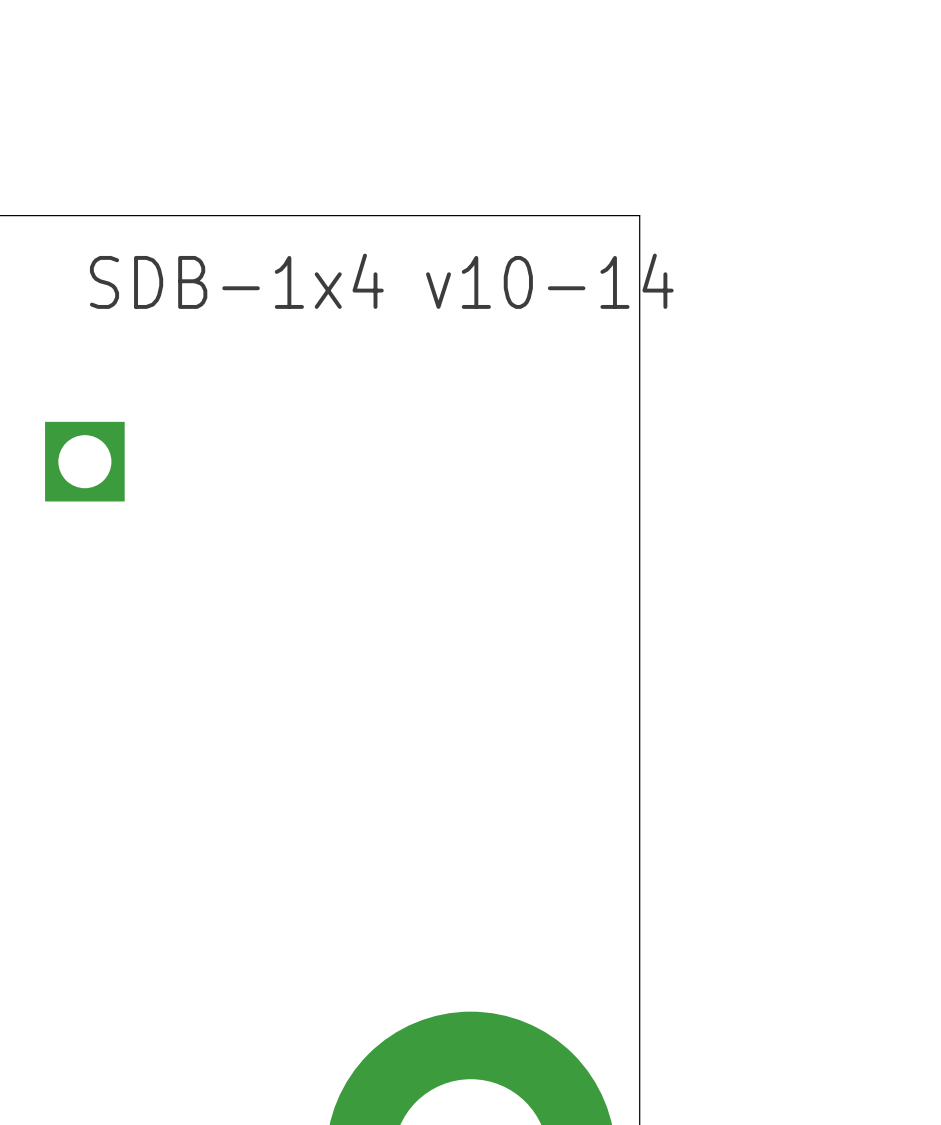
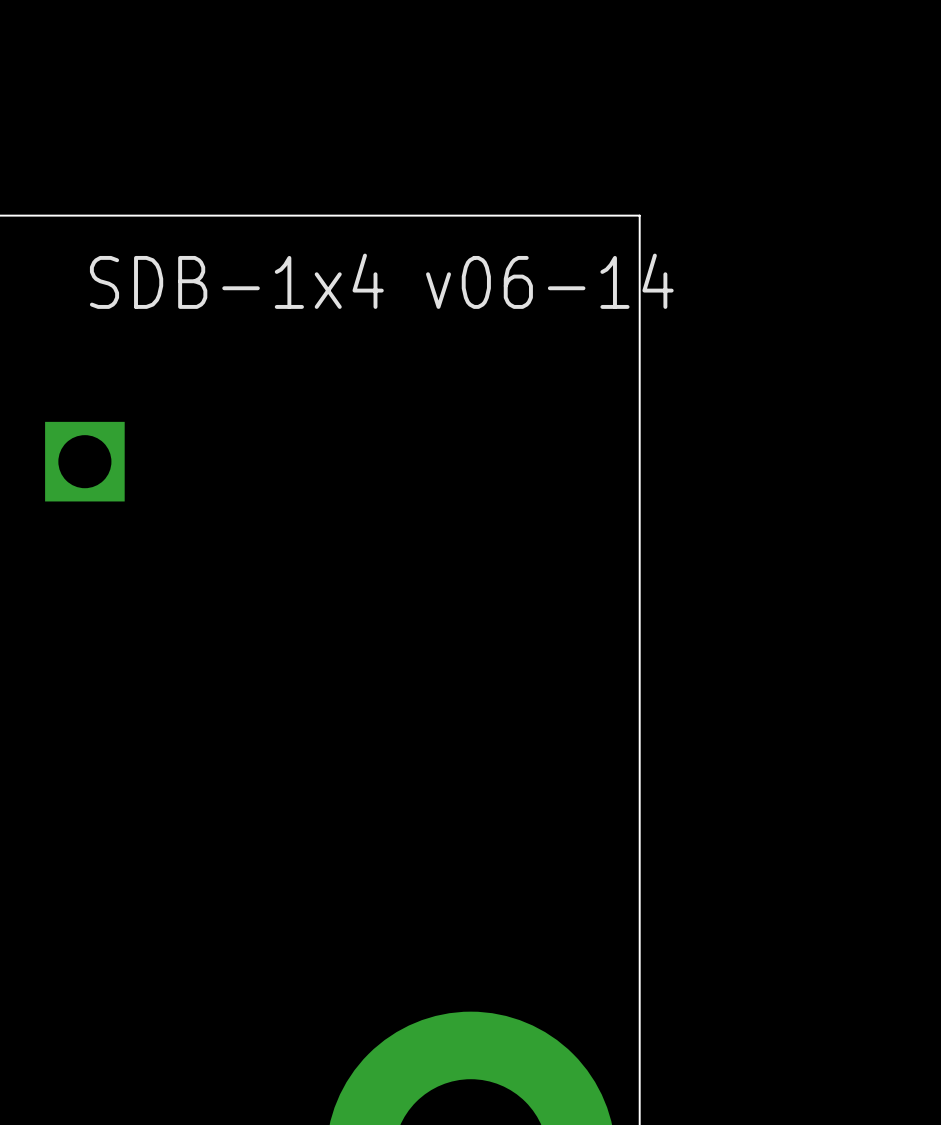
text: SDB-1x4 v10-14 (381, 281) -> SDB-1x4 v06-14 (381, 281)

